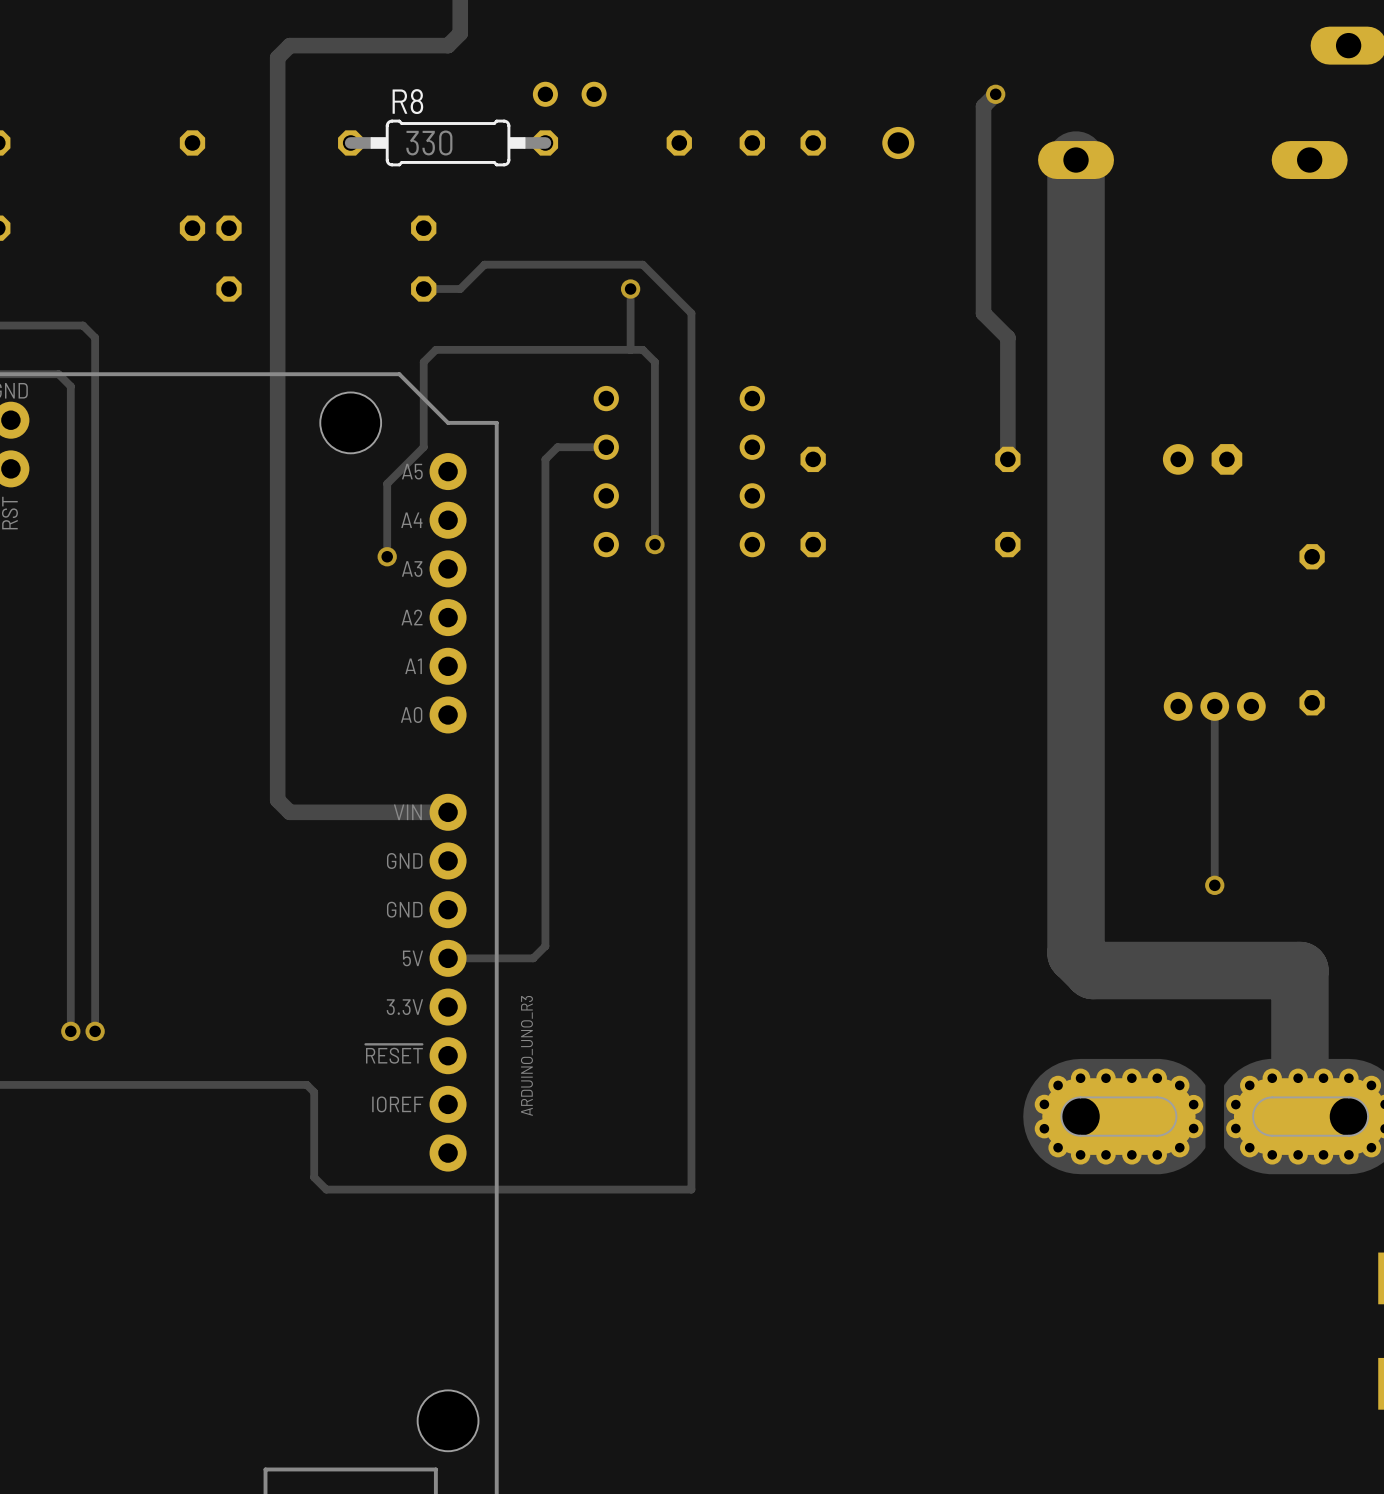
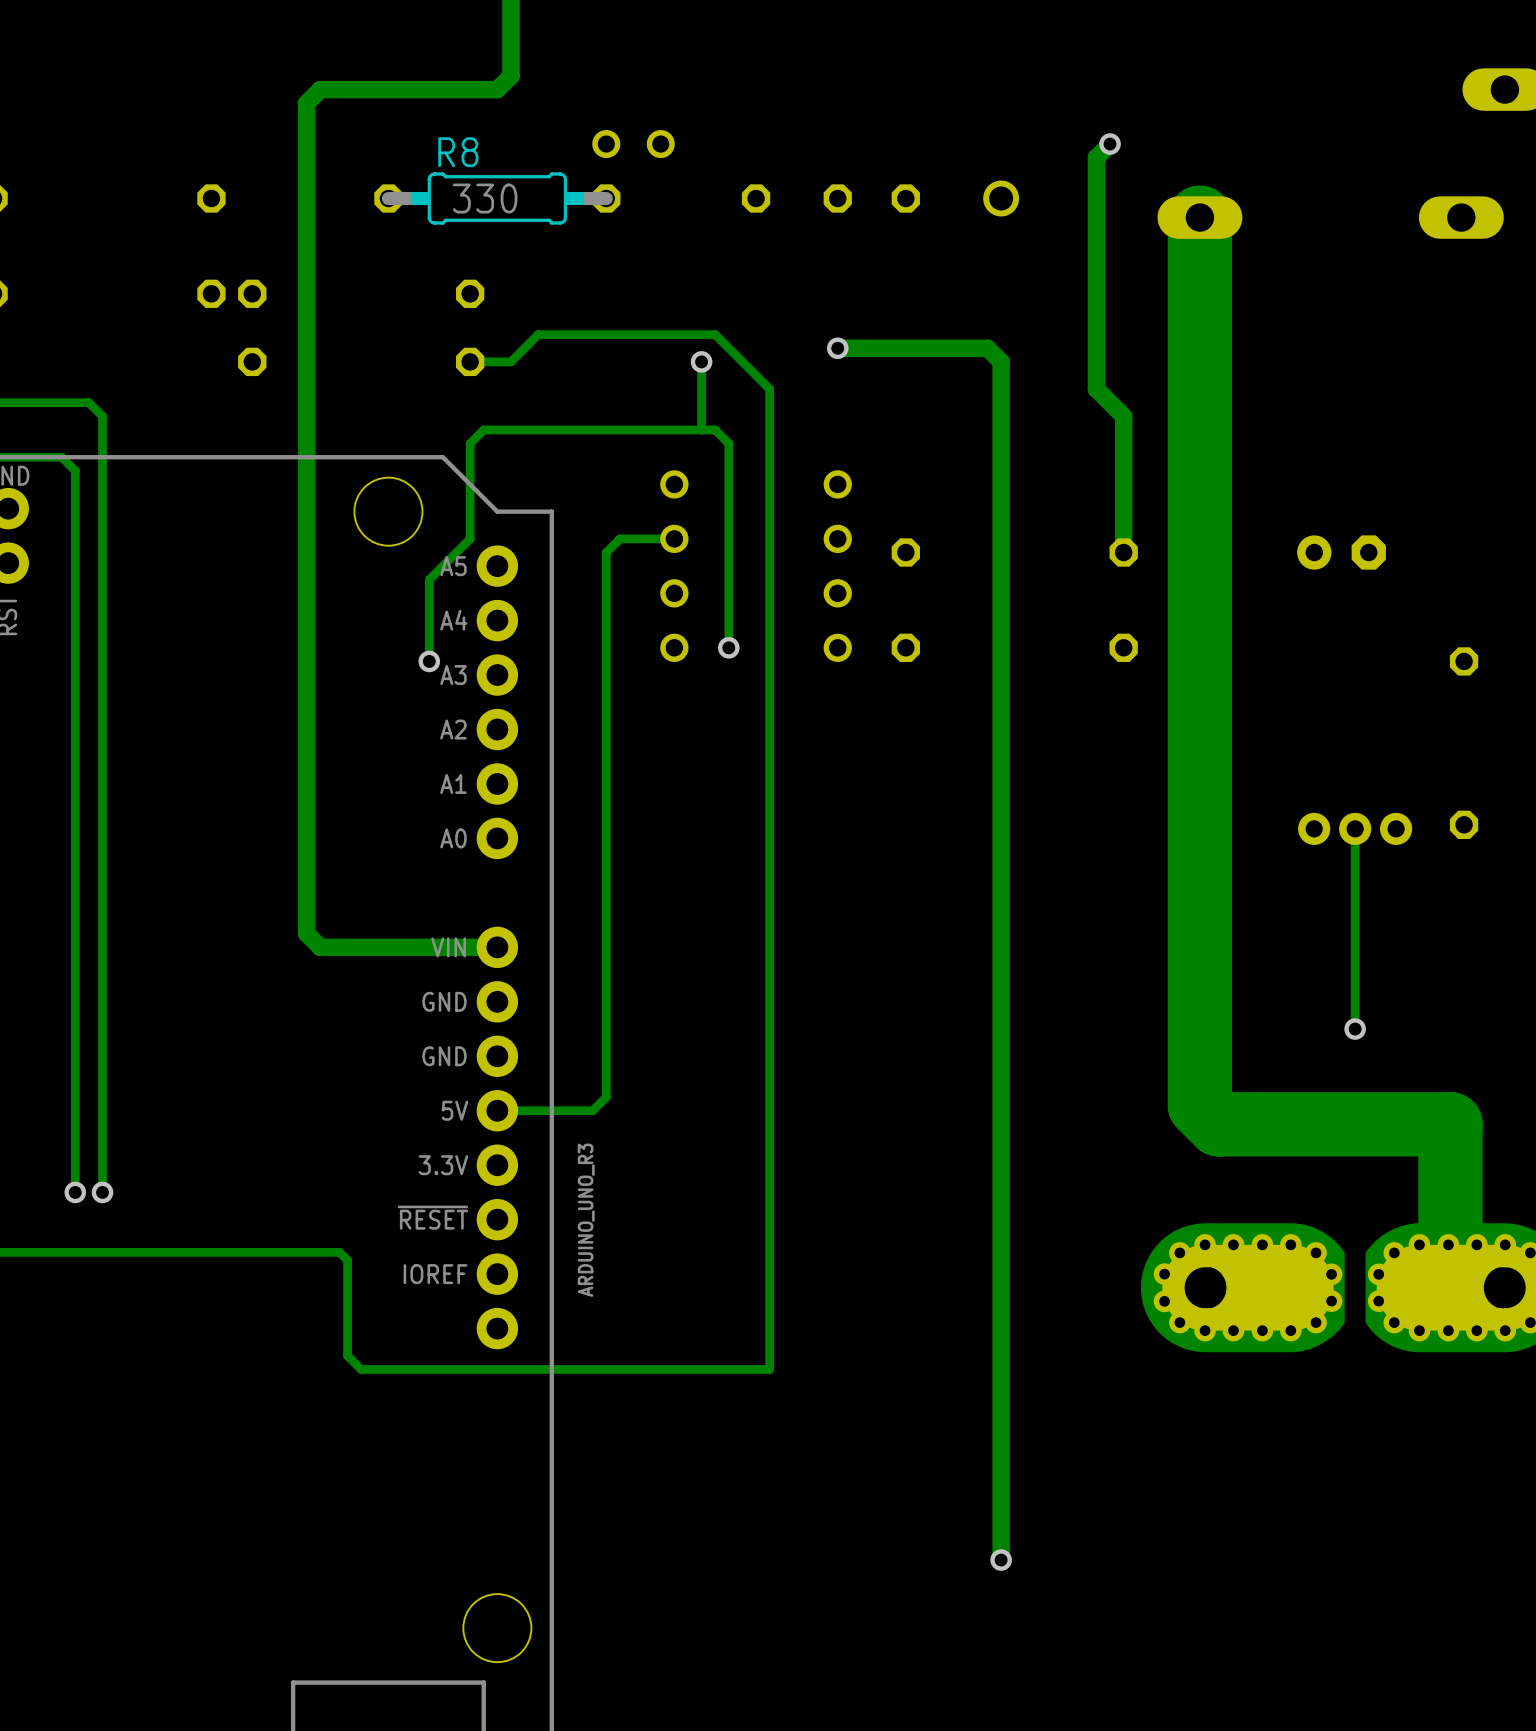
track: none -> (837, 348) (987, 348) (1001, 361) (1001, 1560)
via: none -> (837, 348)
via: none -> (1001, 1560)

